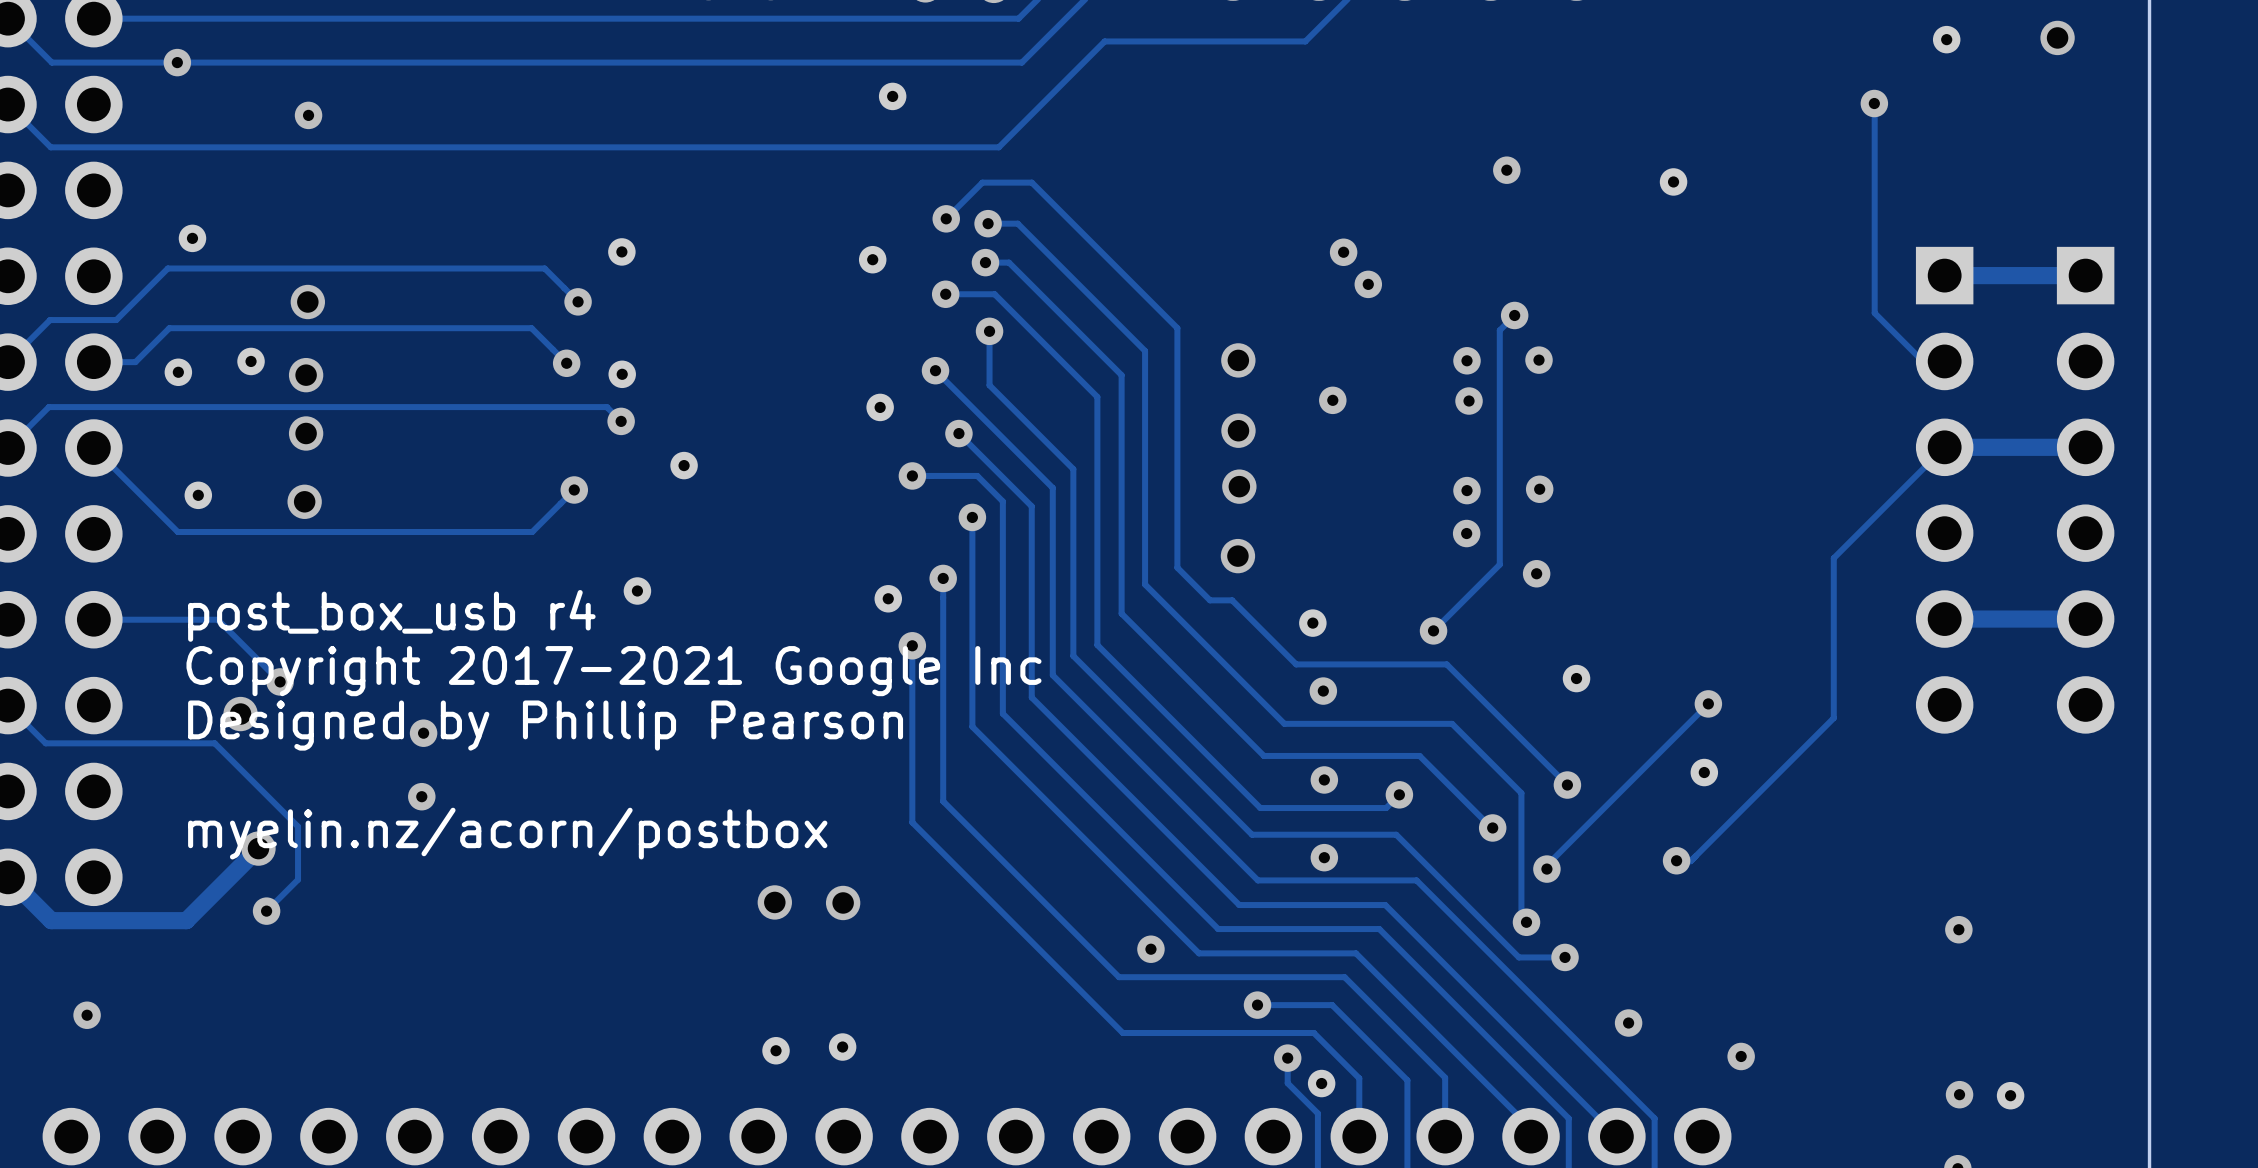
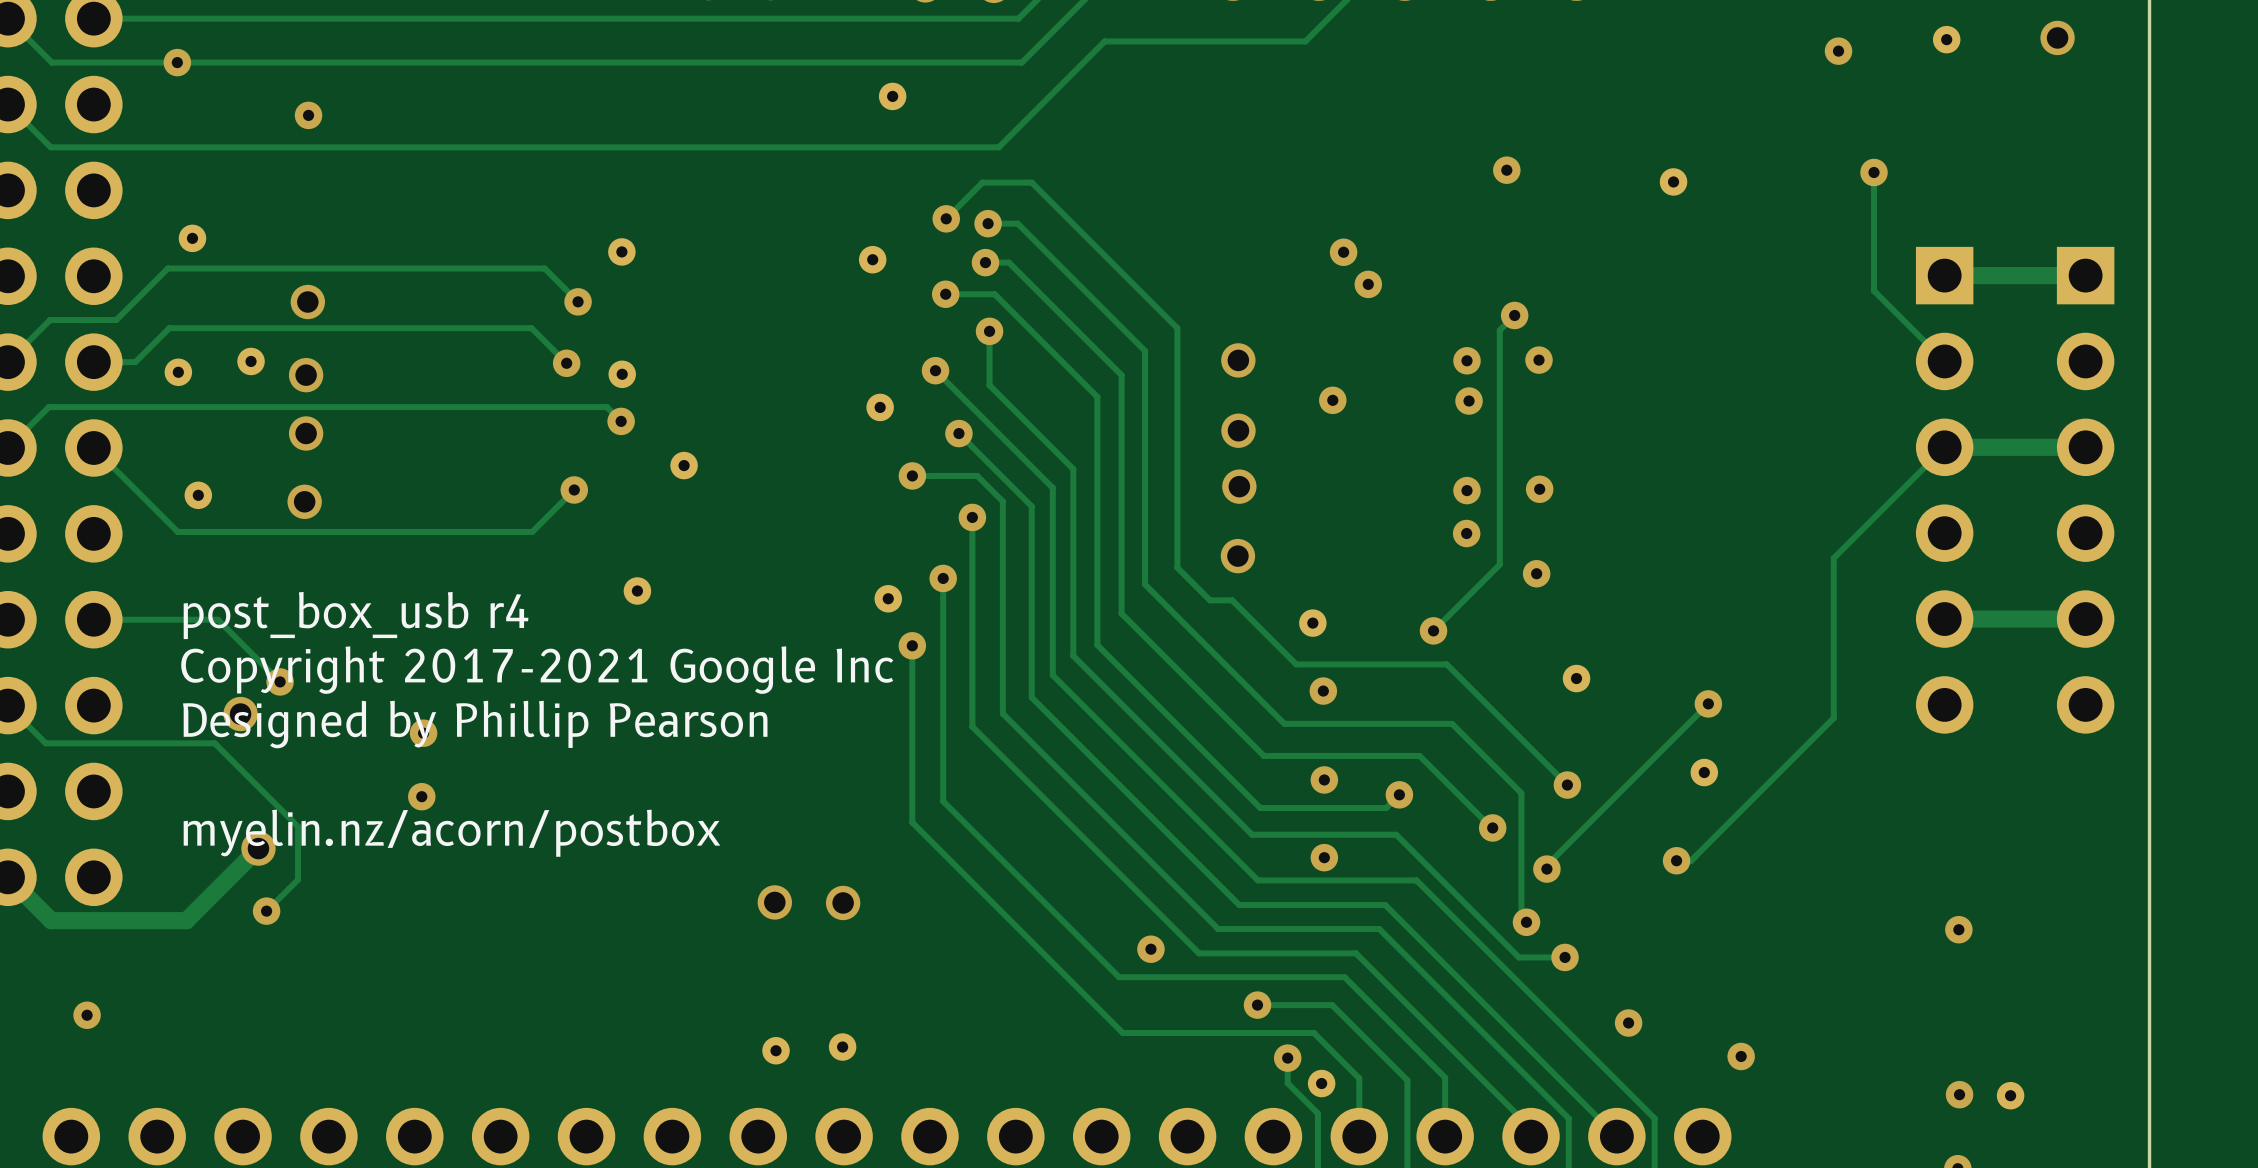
via: none -> (1838, 51)
track: (1874, 103) (1874, 313) (1923, 361) (1944, 361) -> (1874, 172) (1874, 290) (1944, 361)
via: (1874, 103) -> none
via: none -> (1874, 172)

